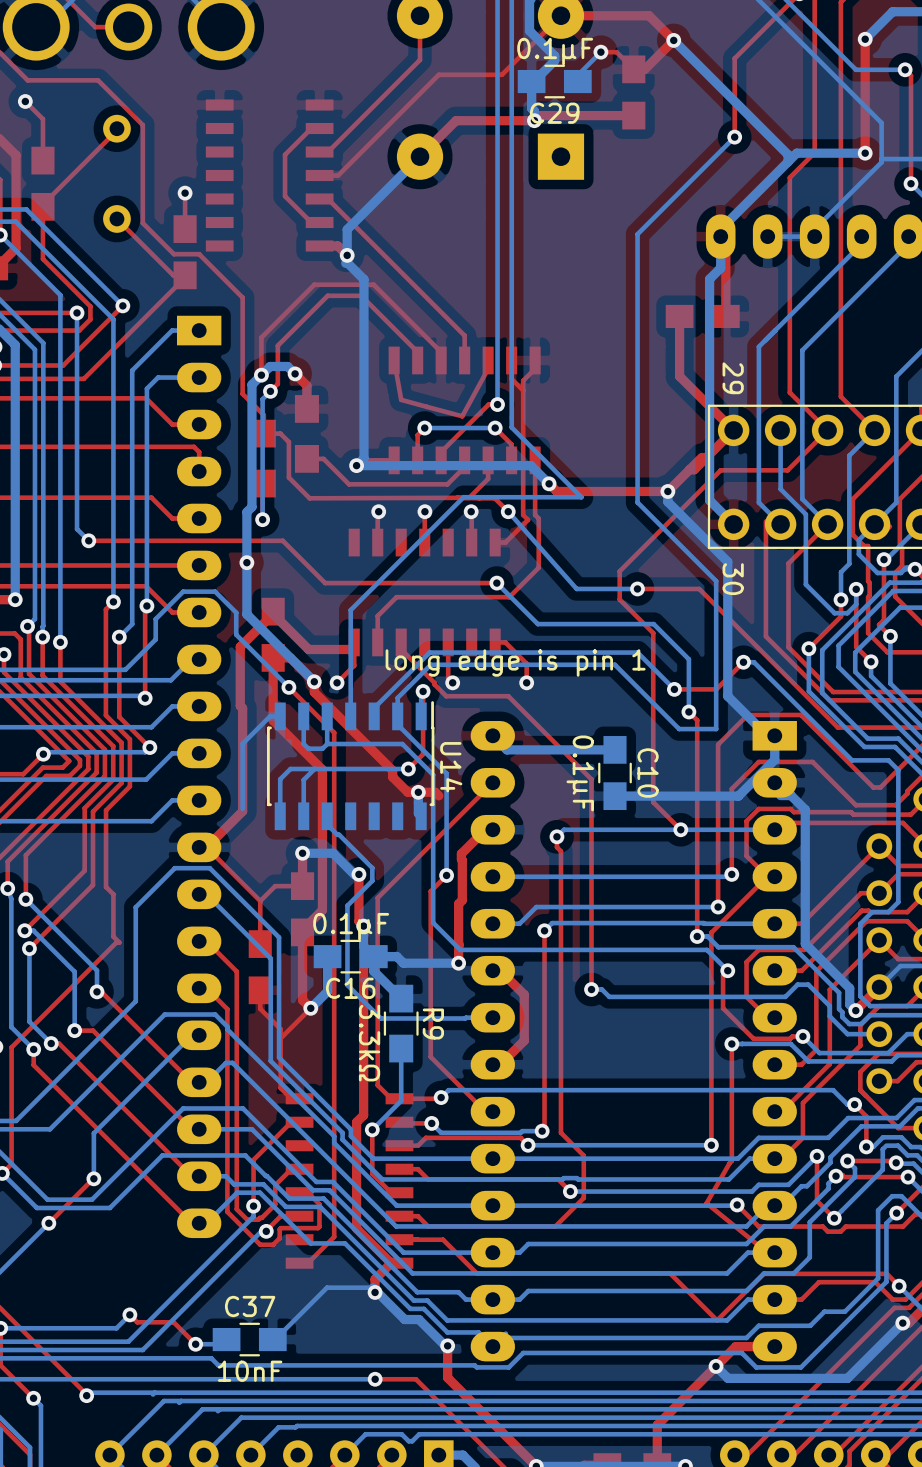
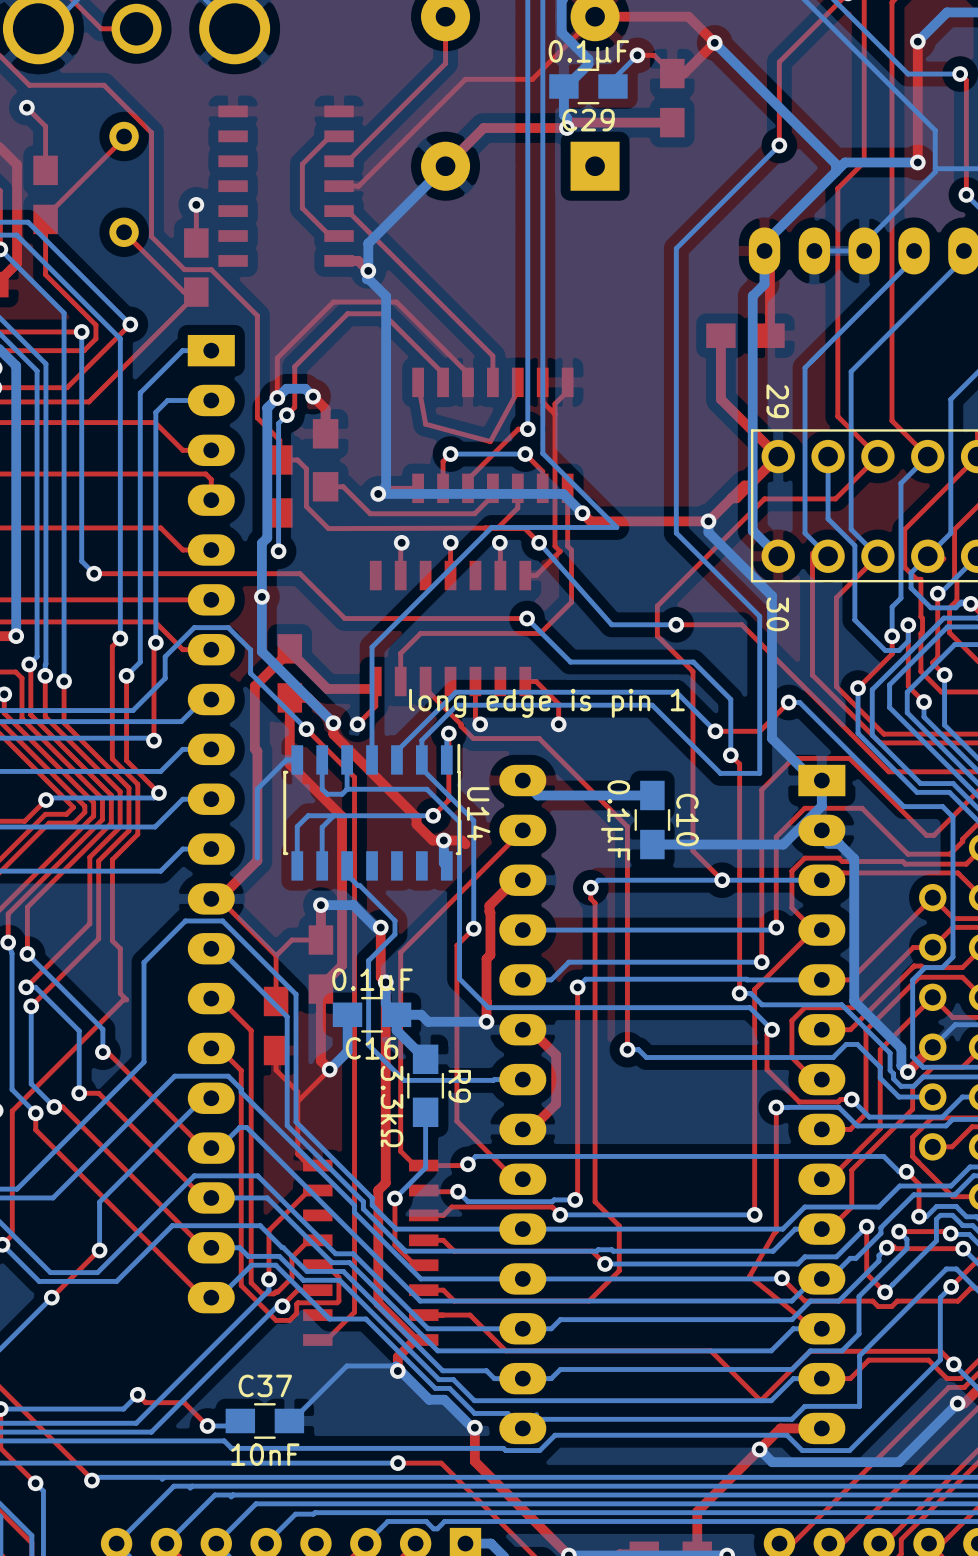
bottom track: (878, 1210) (878, 1278) (844, 1311) (824, 1311) (810, 1325) -> (931, 1283) (859, 1355) (859, 1406)

